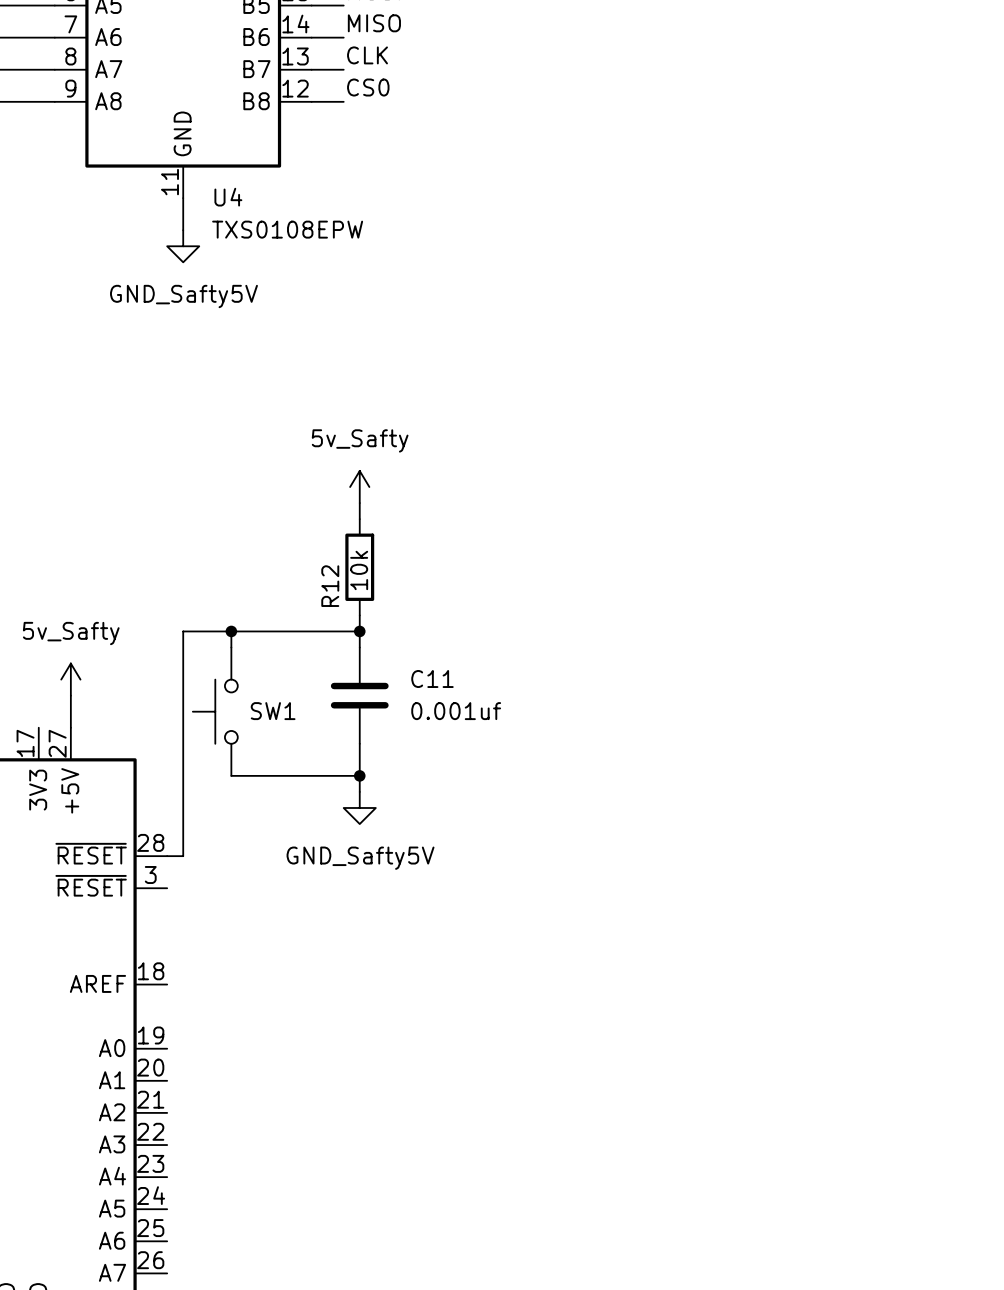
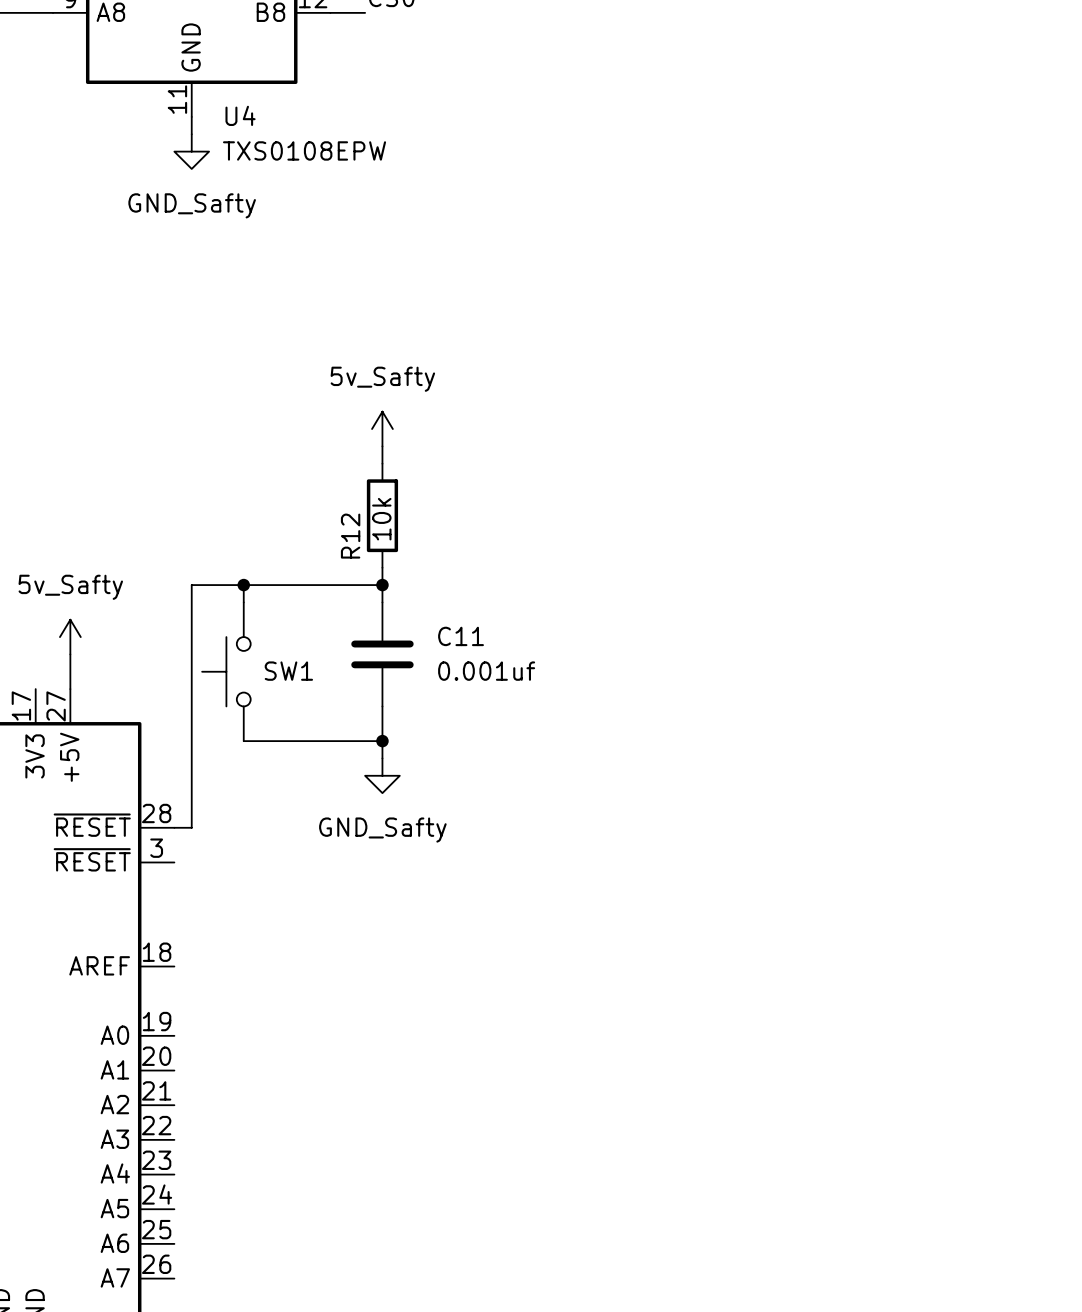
power symbol: none -> GND_Safty (191, 151)
power symbol: GND_Safty5V (183, 246) -> none
power symbol: GND_Safty5V (359, 807) -> GND_Safty (382, 775)

